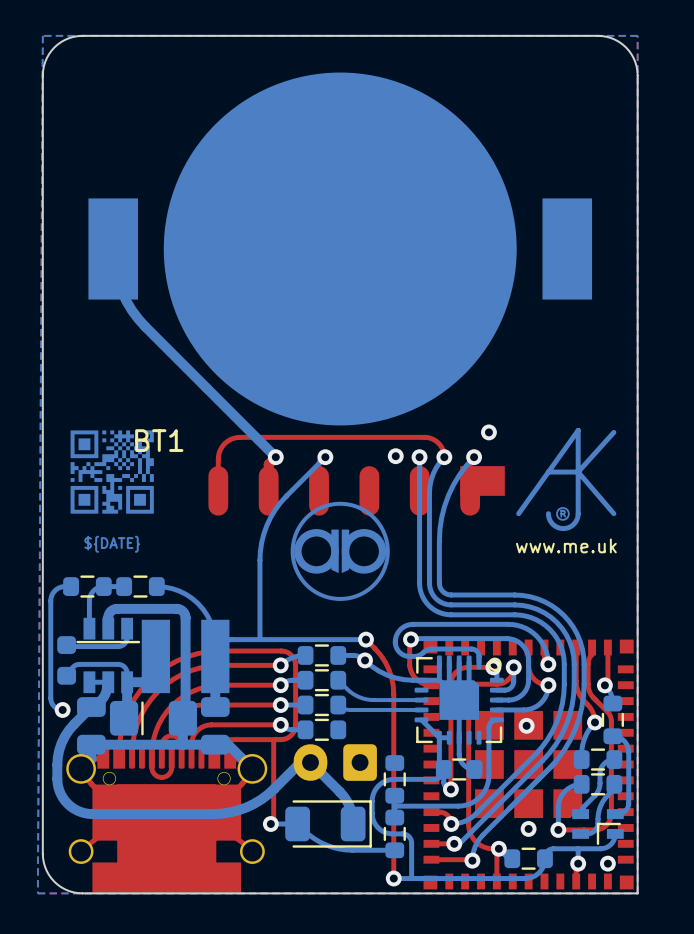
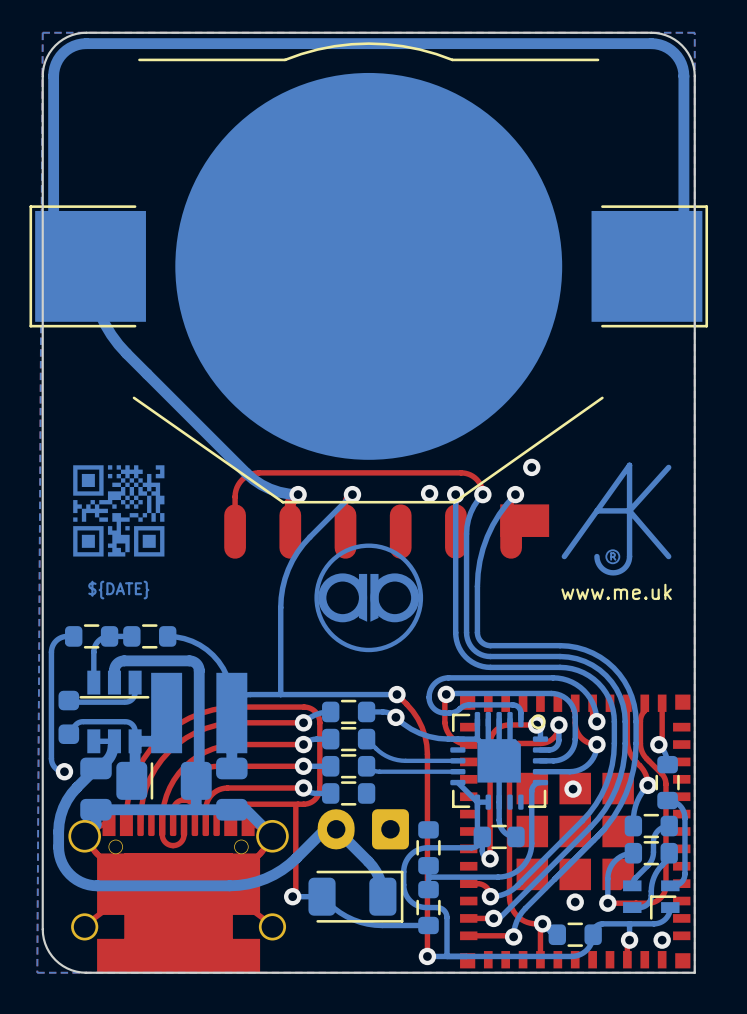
bottom track: (113, 249) (117, 280) (126, 300) (138, 318) (275, 457) -> (646, 266) (659, 264) (669, 258) (678, 249) (683, 233) (683, 71) (677, 56) (663, 46) (651, 43) (86, 43) (69, 47) (57, 59) (53, 76) (53, 239) (57, 252) (70, 264) (90, 266) (92, 290) (99, 313) (111, 334) (126, 353) (253, 479) (270, 489) (298, 494)
BT1: (340, 249) -> none
part: none -> (368, 272)

